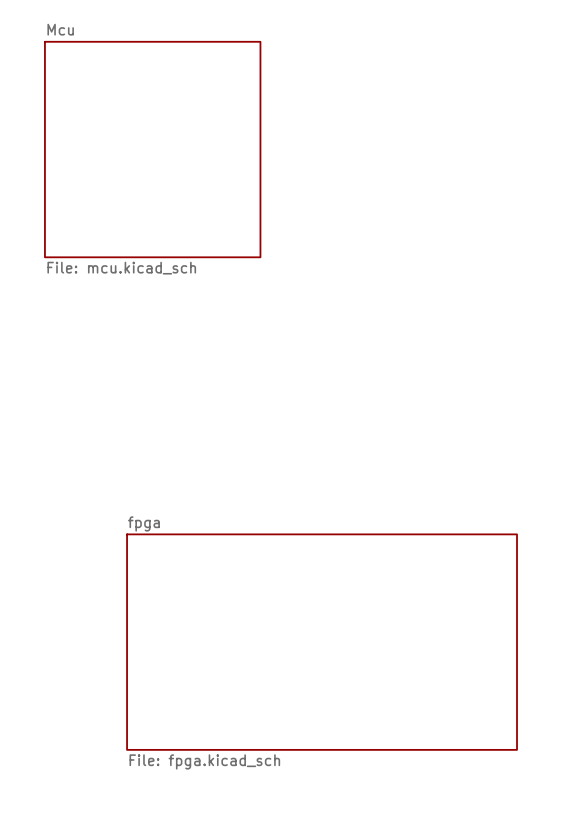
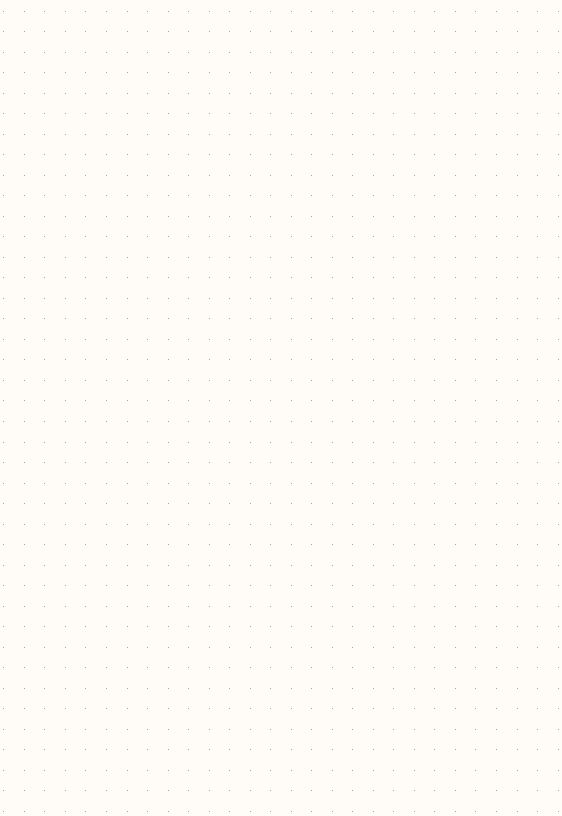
sheet Mcu: File: mcu.kicad_sch (152, 149) -> none
sheet fpga: File: fpga.kicad_sch (322, 642) -> none

